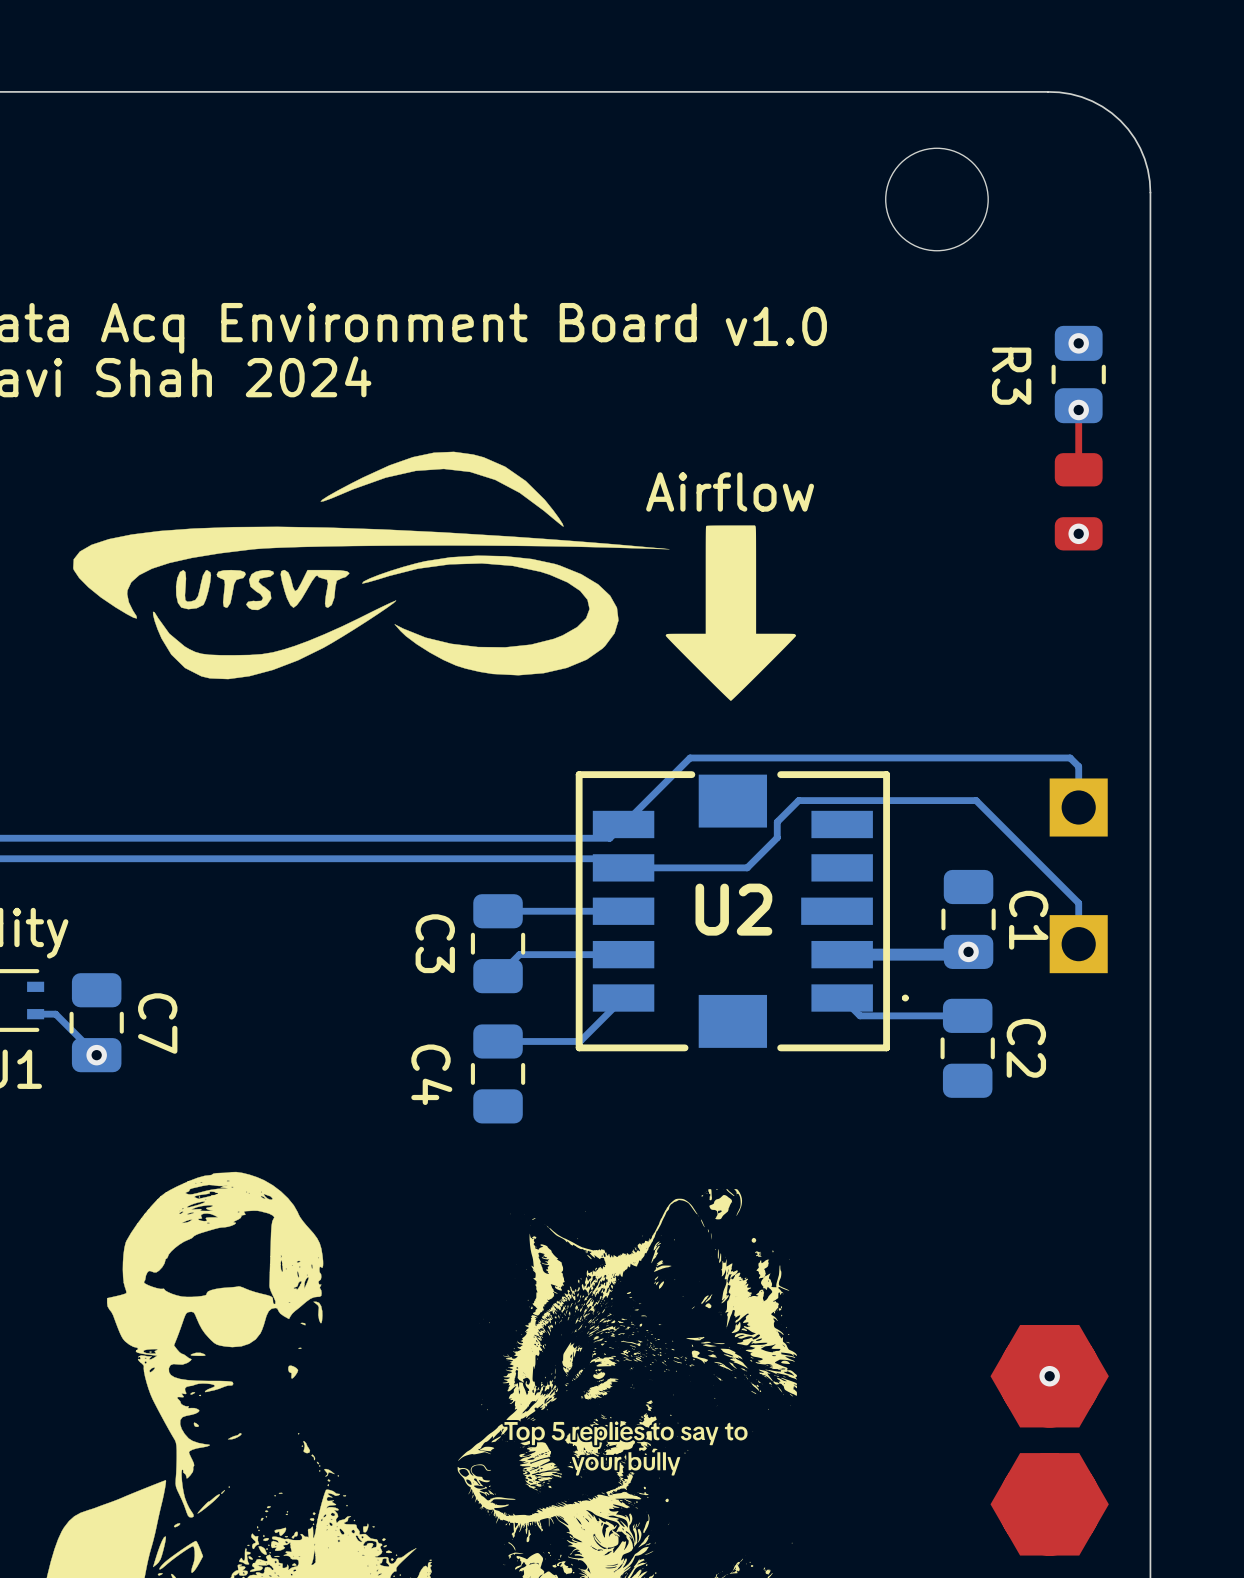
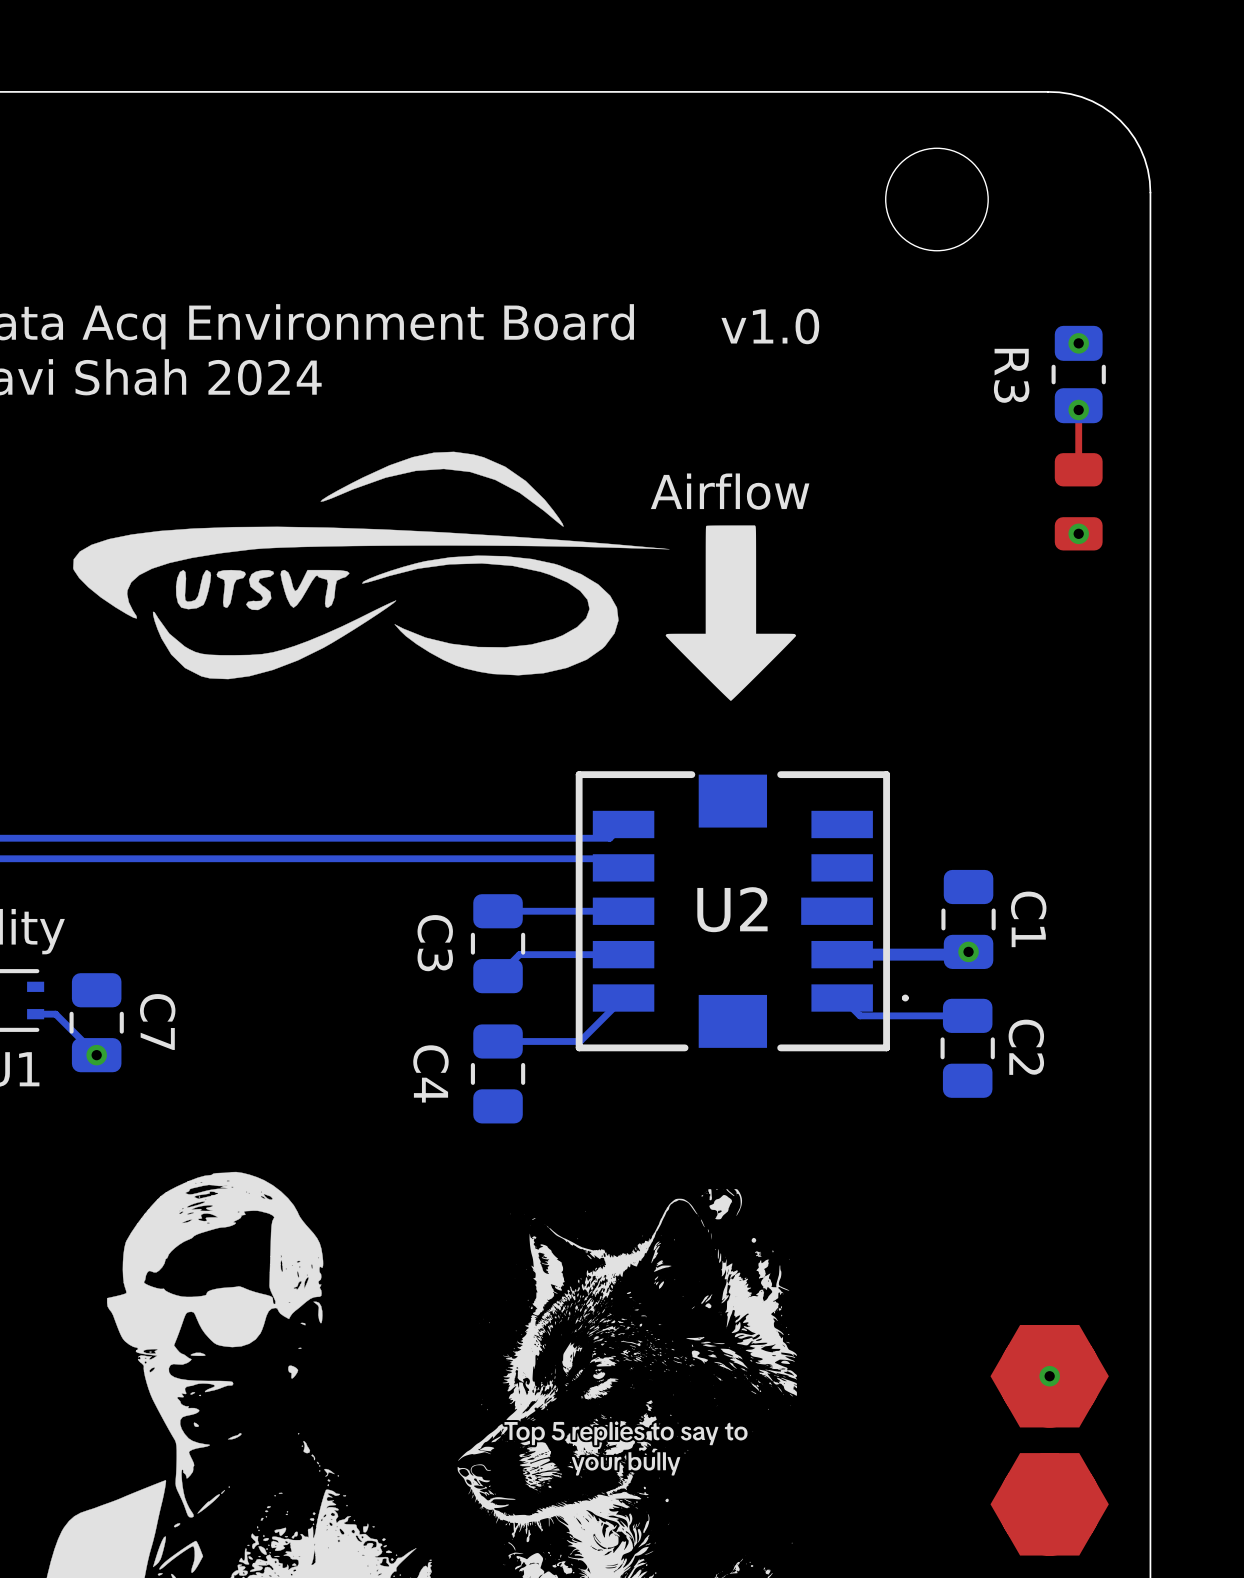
bottom track: (1078, 807) (1078, 766) (1070, 757) (690, 757) (623, 824) -> none
part: (1078, 807) -> none
bottom track: (623, 867) (747, 867) (777, 837) (777, 822) (798, 800) (976, 800) (1078, 903) (1078, 944) -> none
part: (1078, 944) -> none

